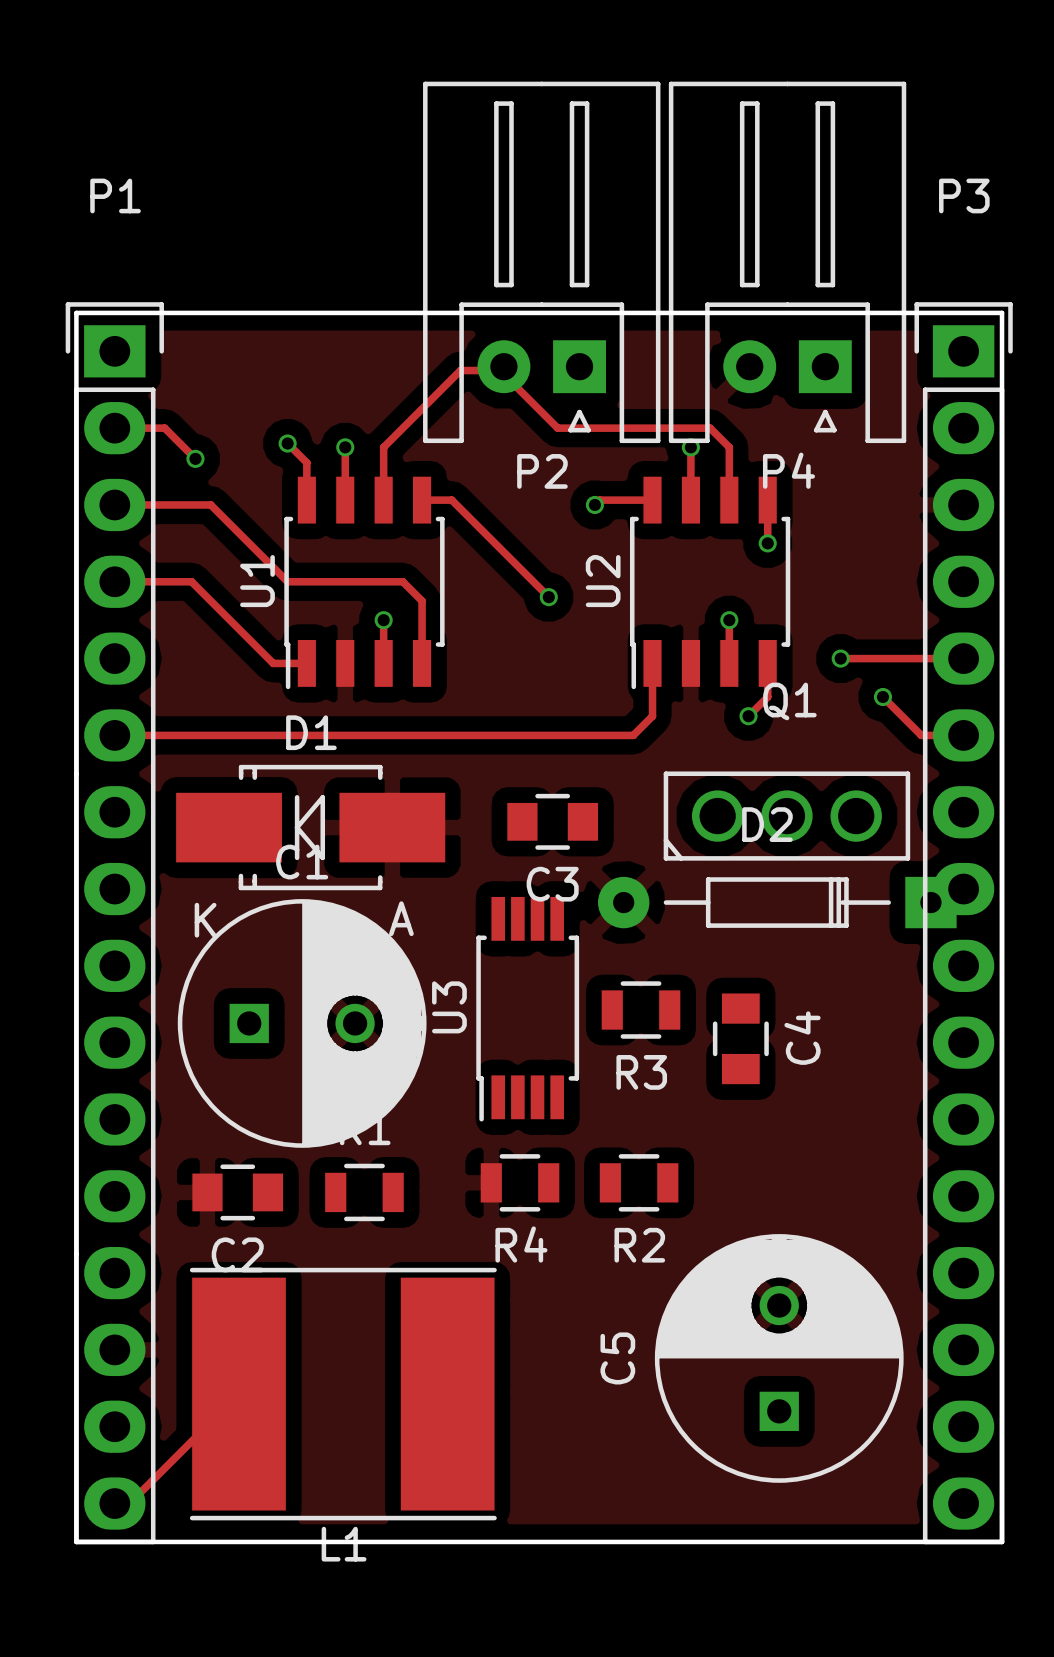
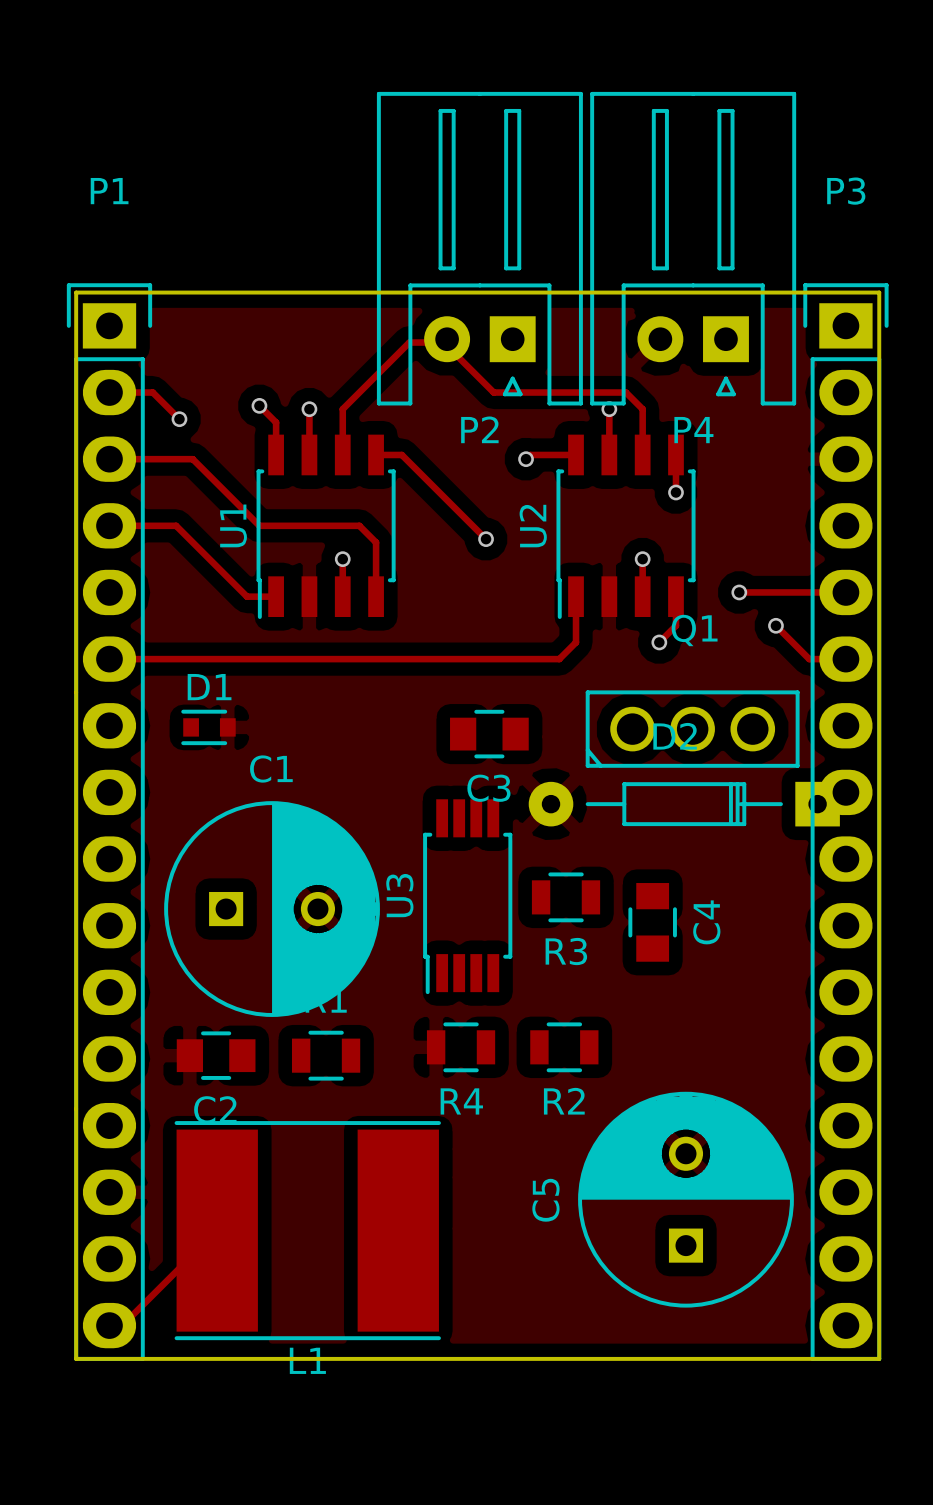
D1 footprint: [176, 764, 446, 891] -> [181, 709, 236, 746]

